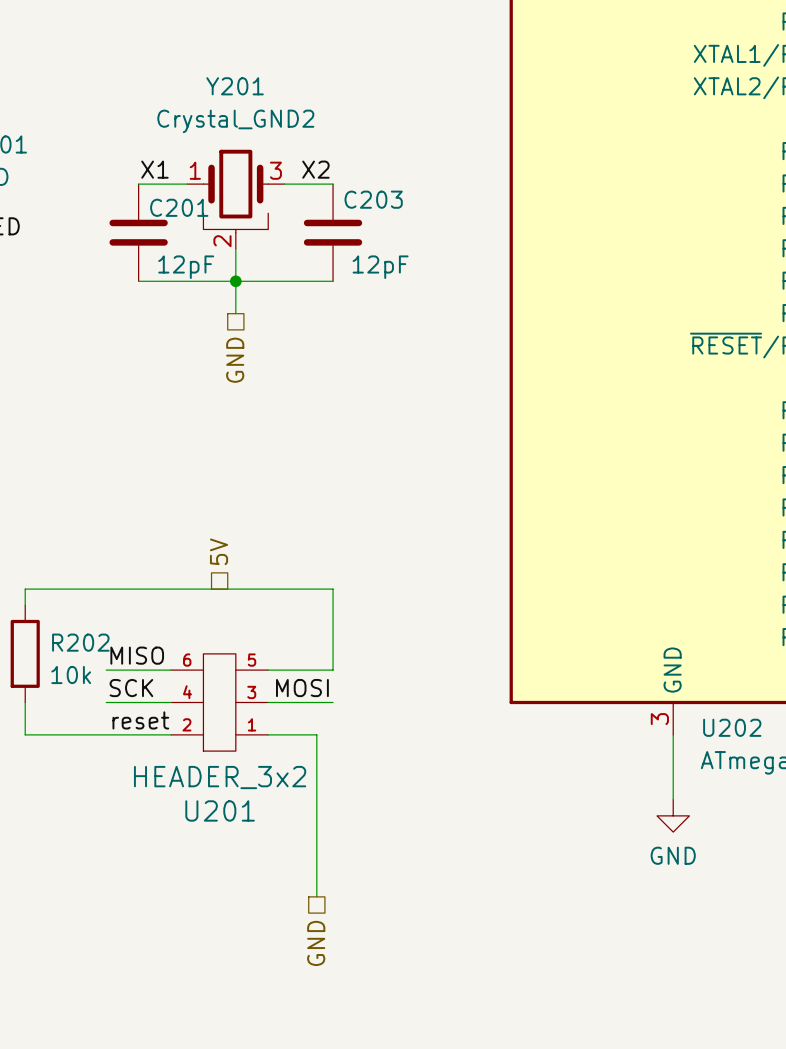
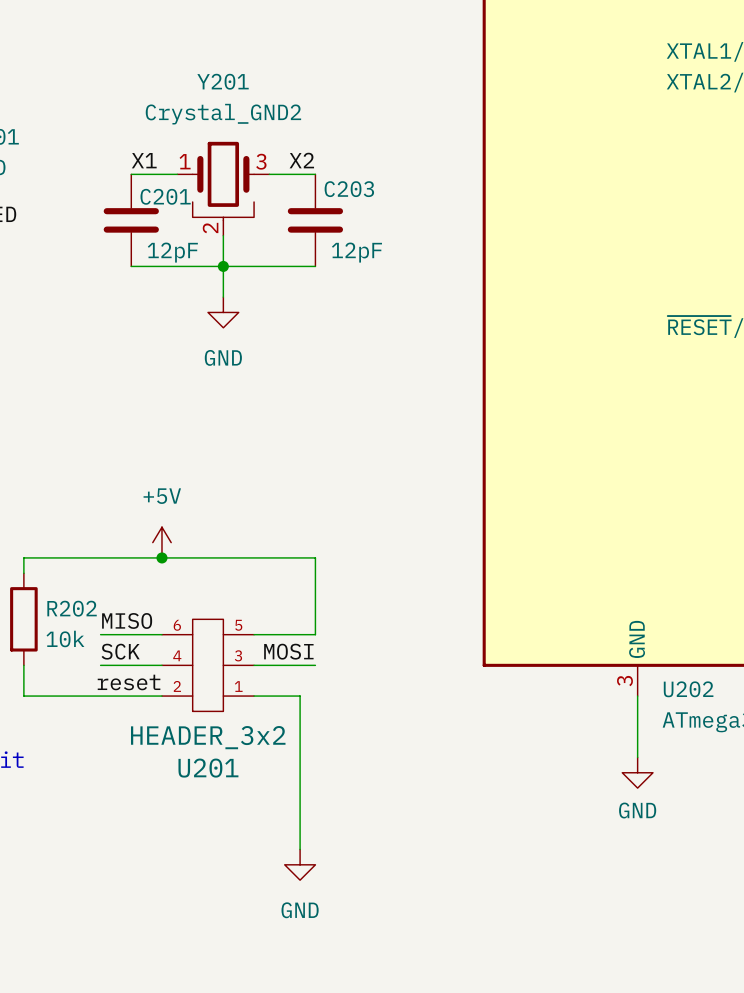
power symbol: none -> GND (223, 312)
hierarchical label: GND (235, 360) -> none
hierarchical label: 5V (219, 551) -> none
power symbol: none -> +5V (161, 542)
junction: none -> (161, 557)
power symbol: none -> GND (300, 864)
hierarchical label: GND (316, 943) -> none

